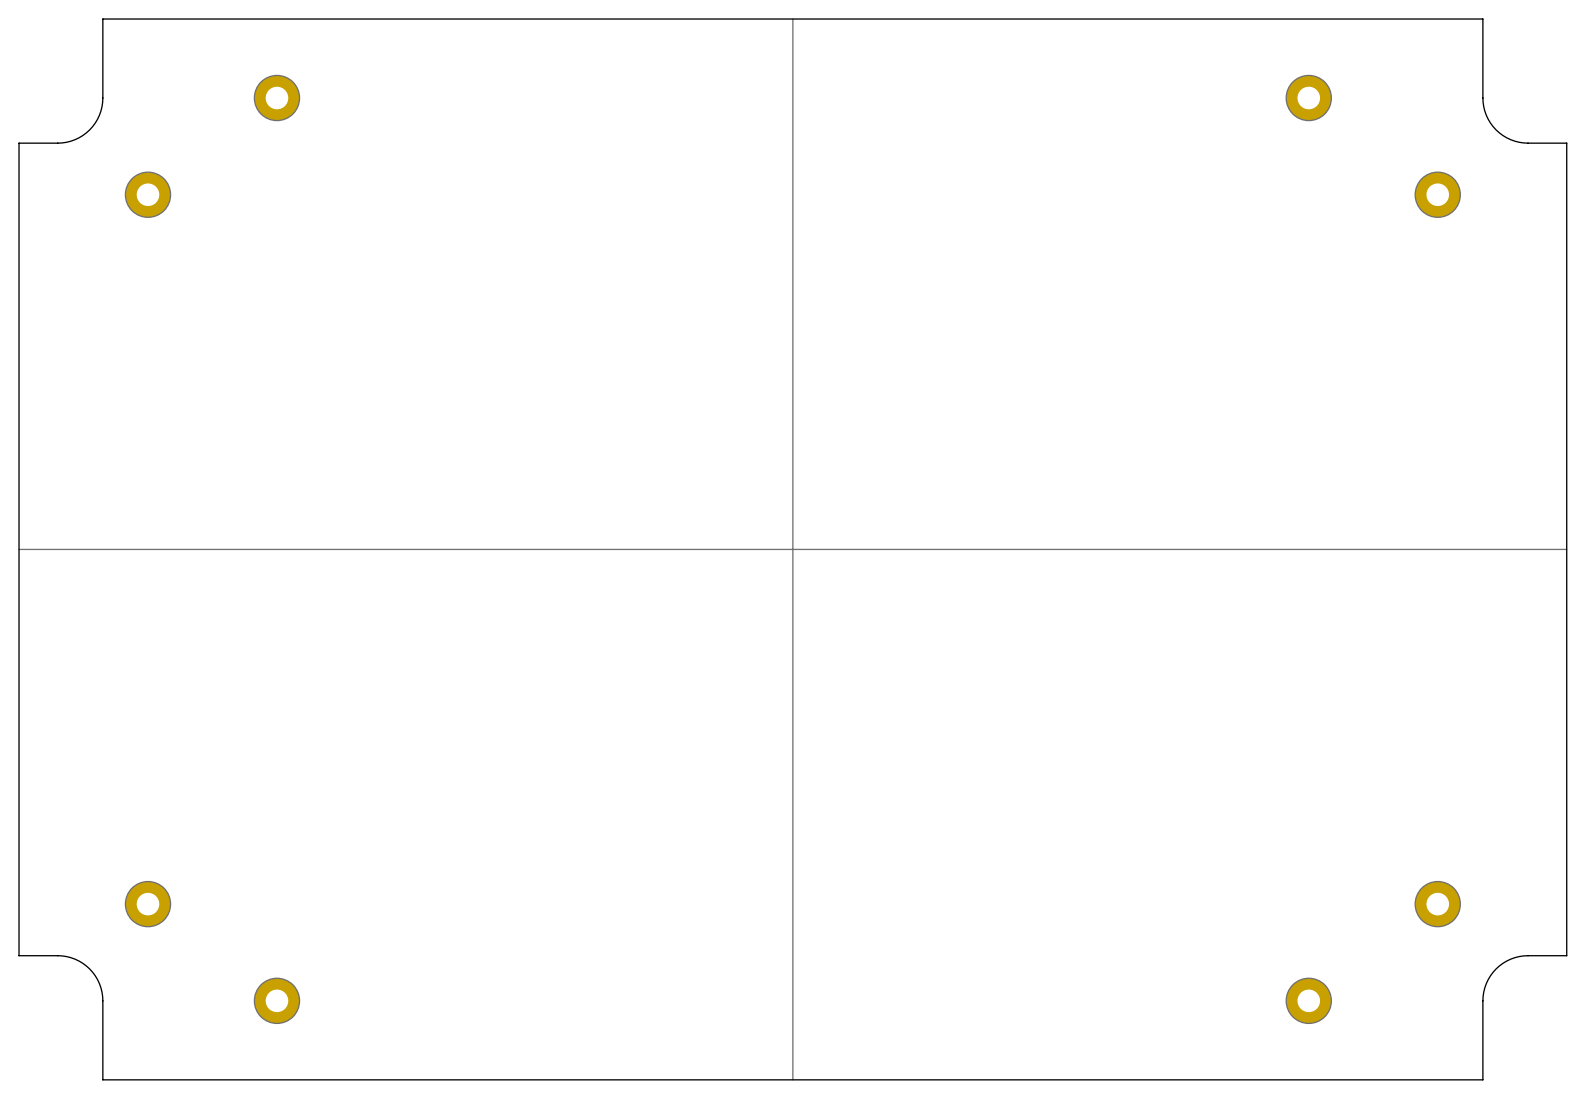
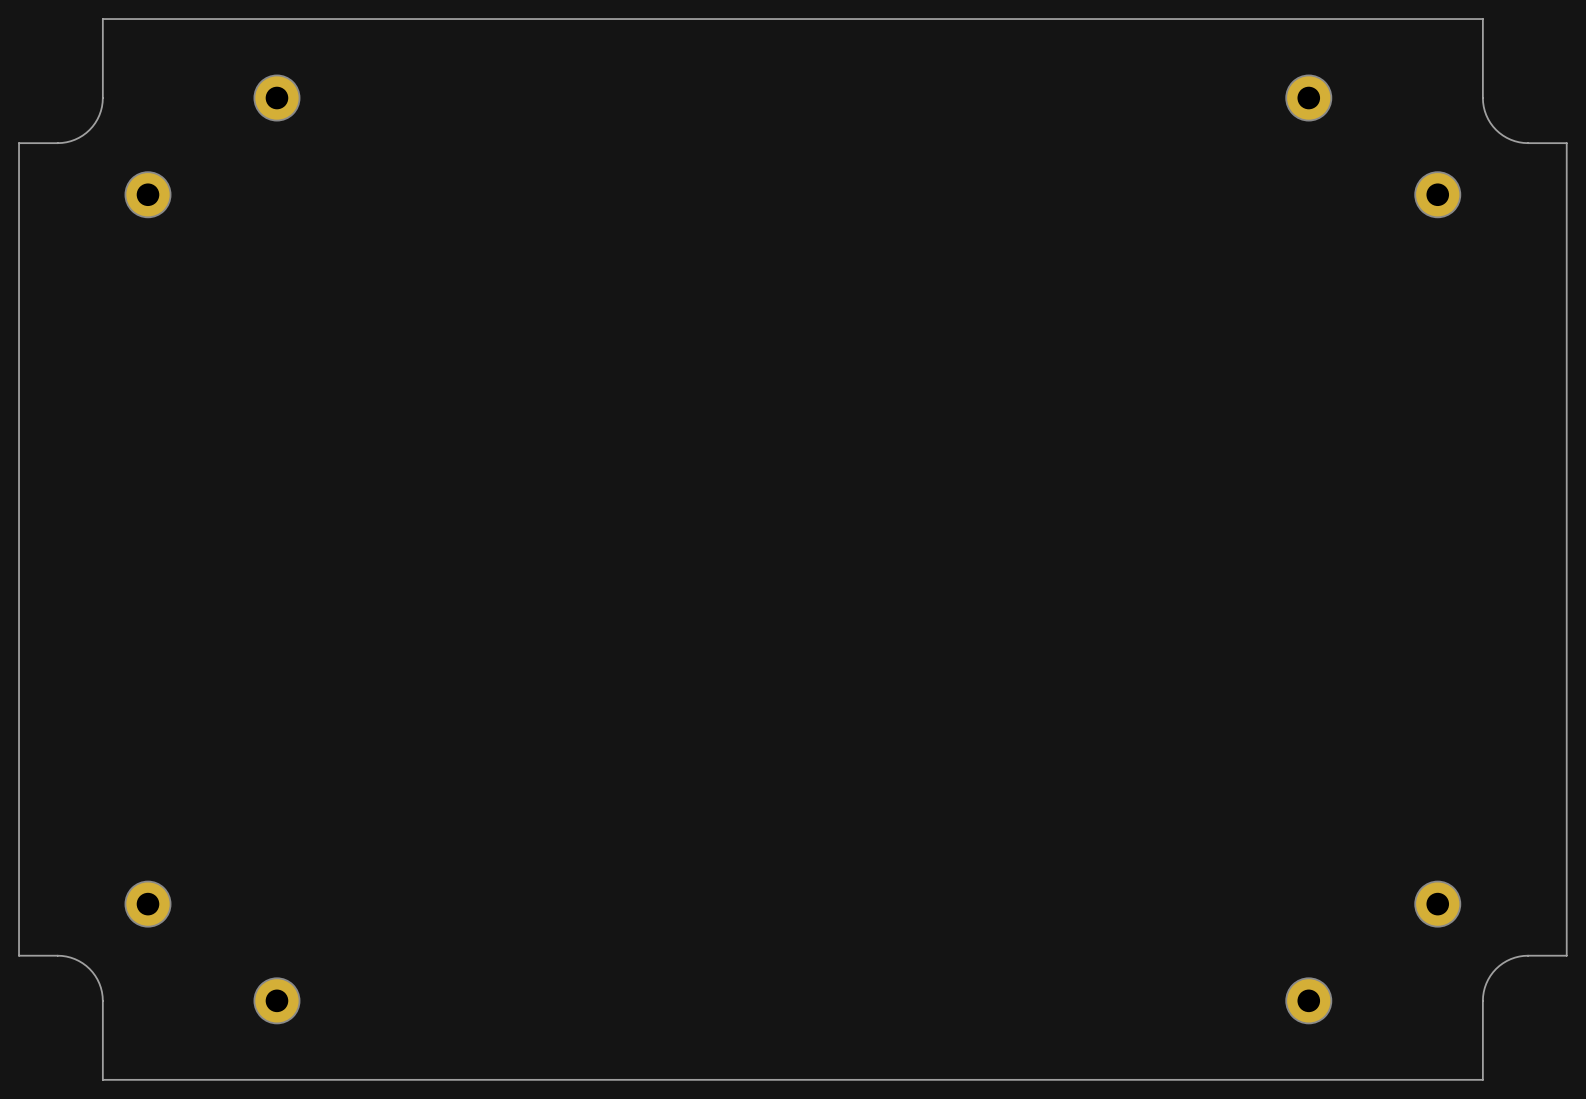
line: (792, 19) (792, 1079) -> none
line: (19, 549) (1566, 549) -> none

